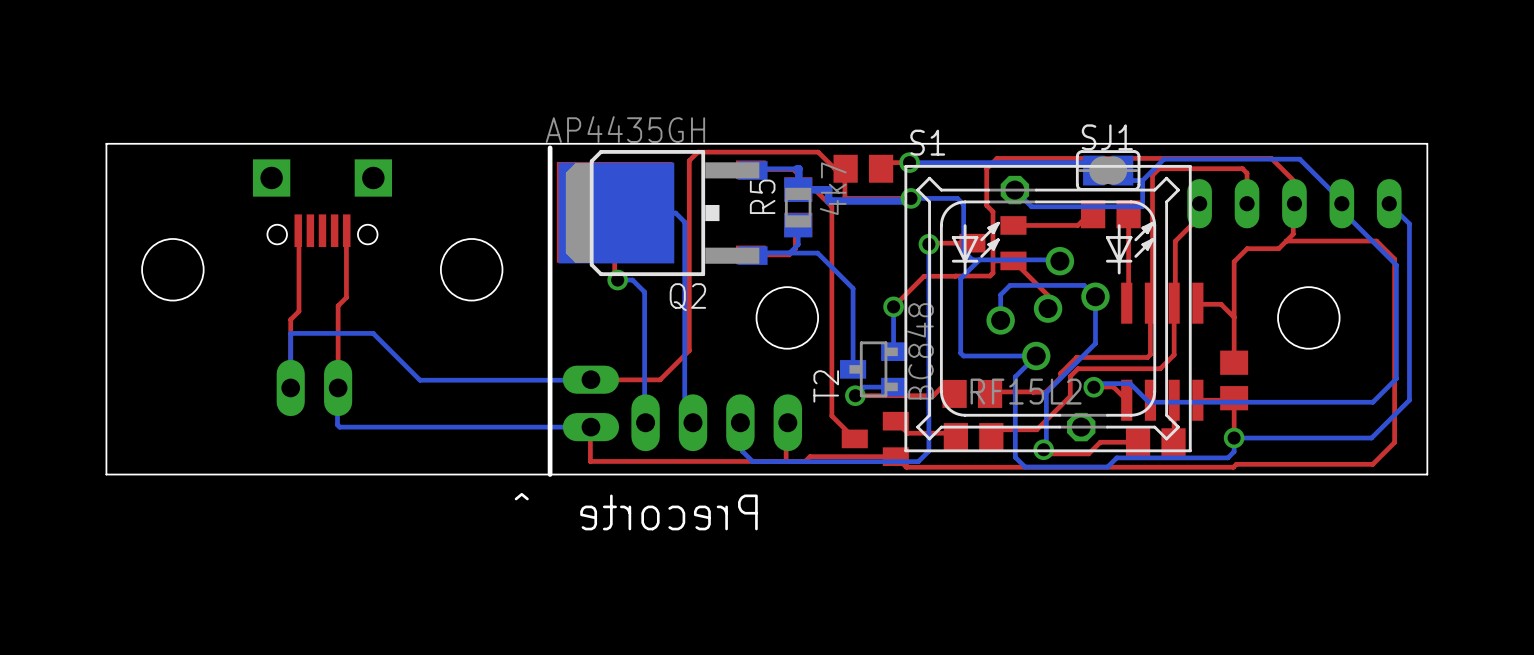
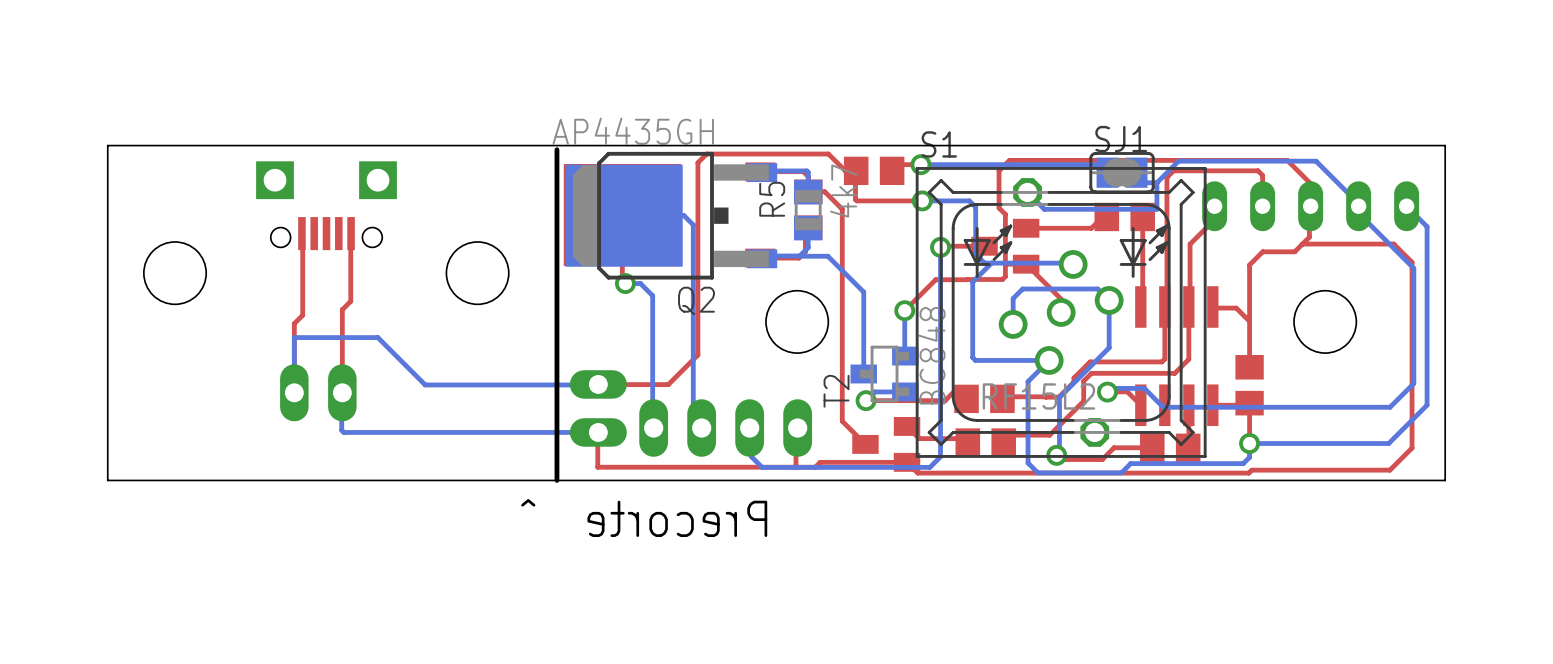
bottom track: (796, 168) (798, 168) (798, 189) (828, 189) (828, 200) (910, 200) (910, 198) -> none

